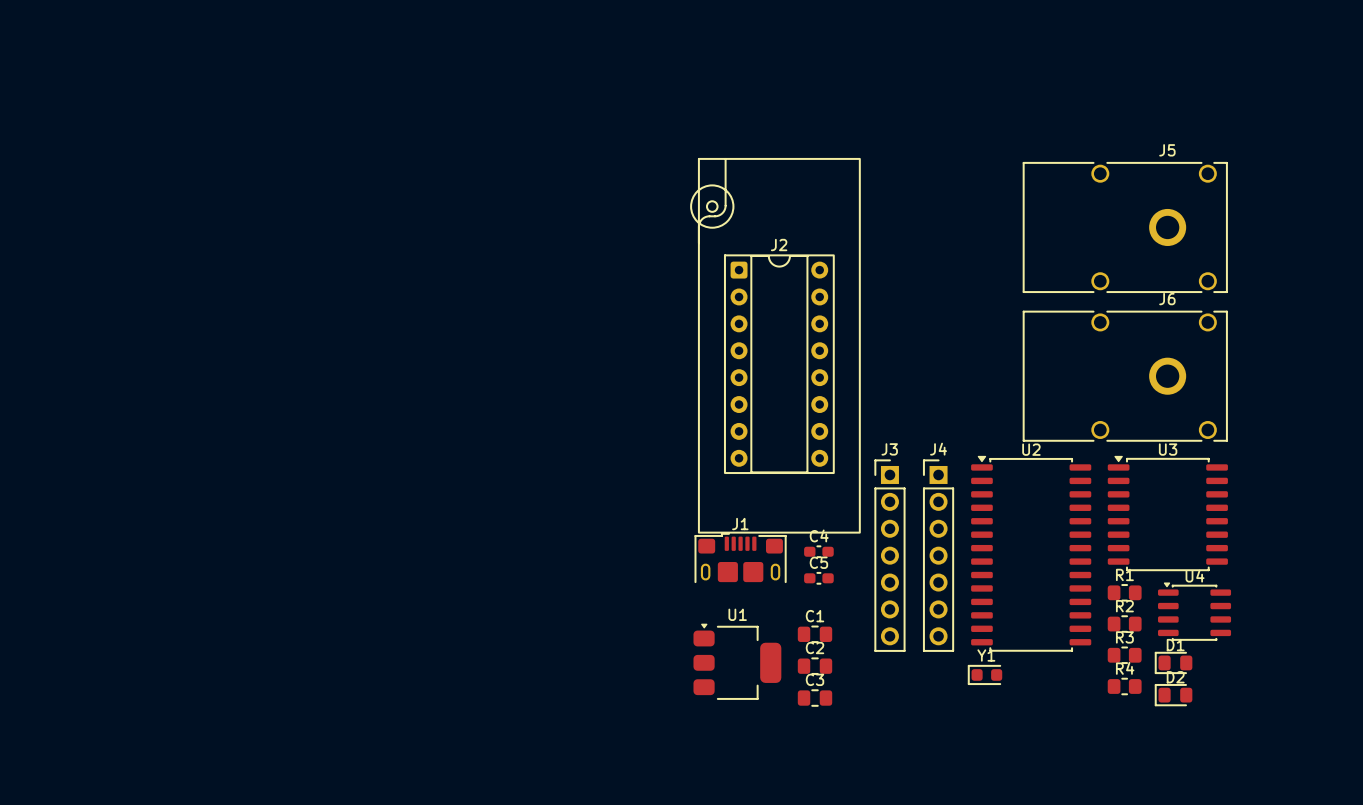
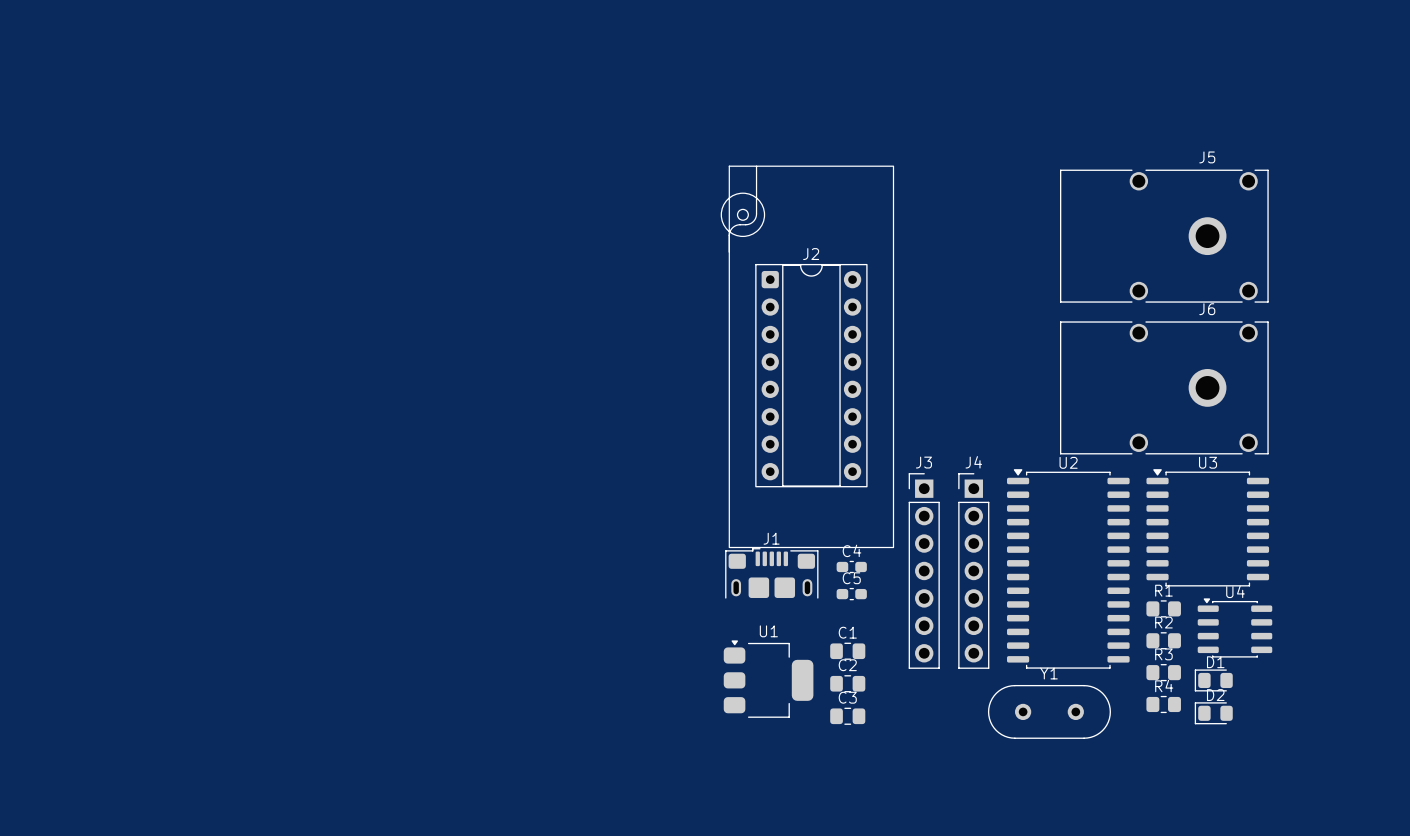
Y1 footprint: [968, 665, 1003, 685] -> [987, 684, 1111, 739]

